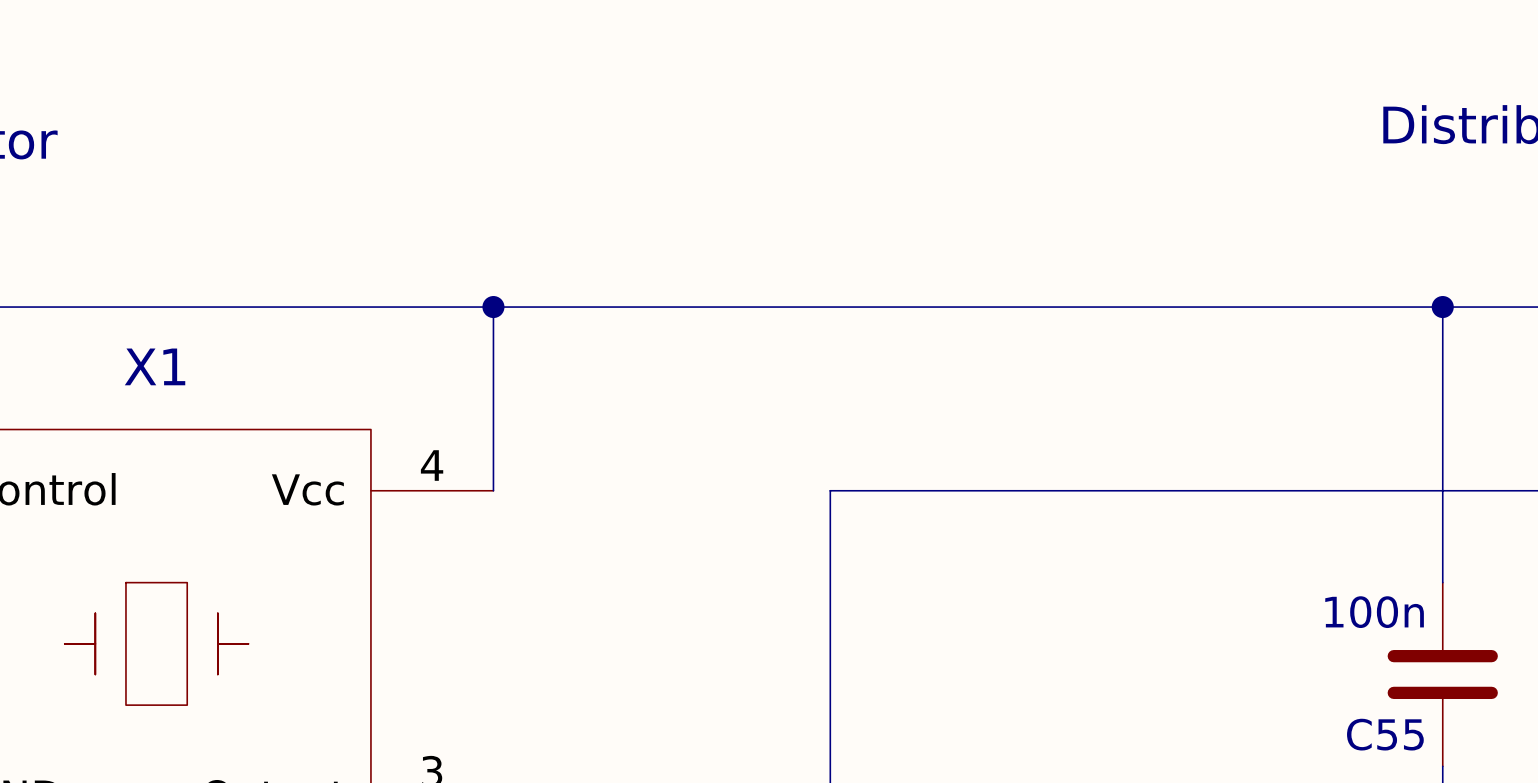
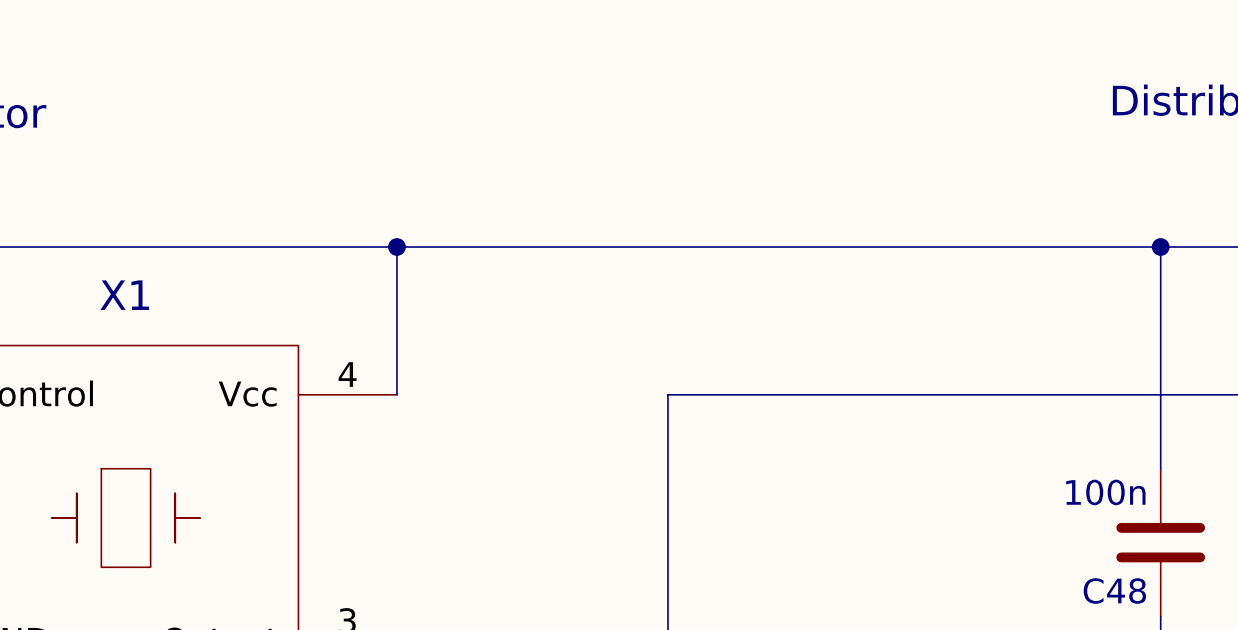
C55 name: C55 (1385, 734) -> C48 (1114, 591)

